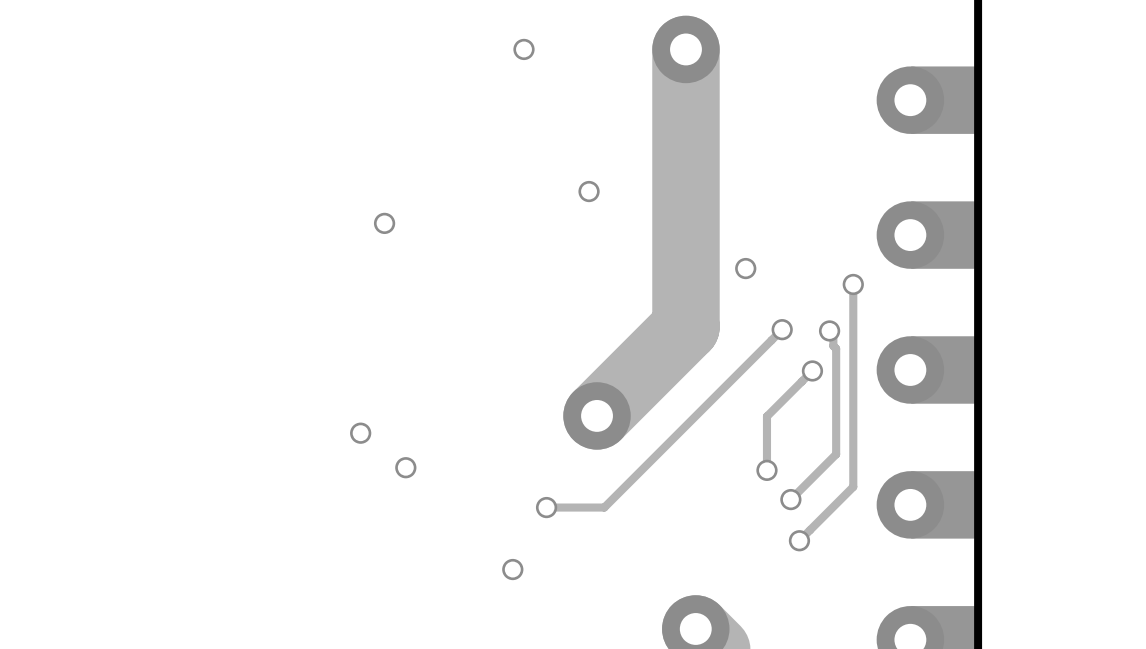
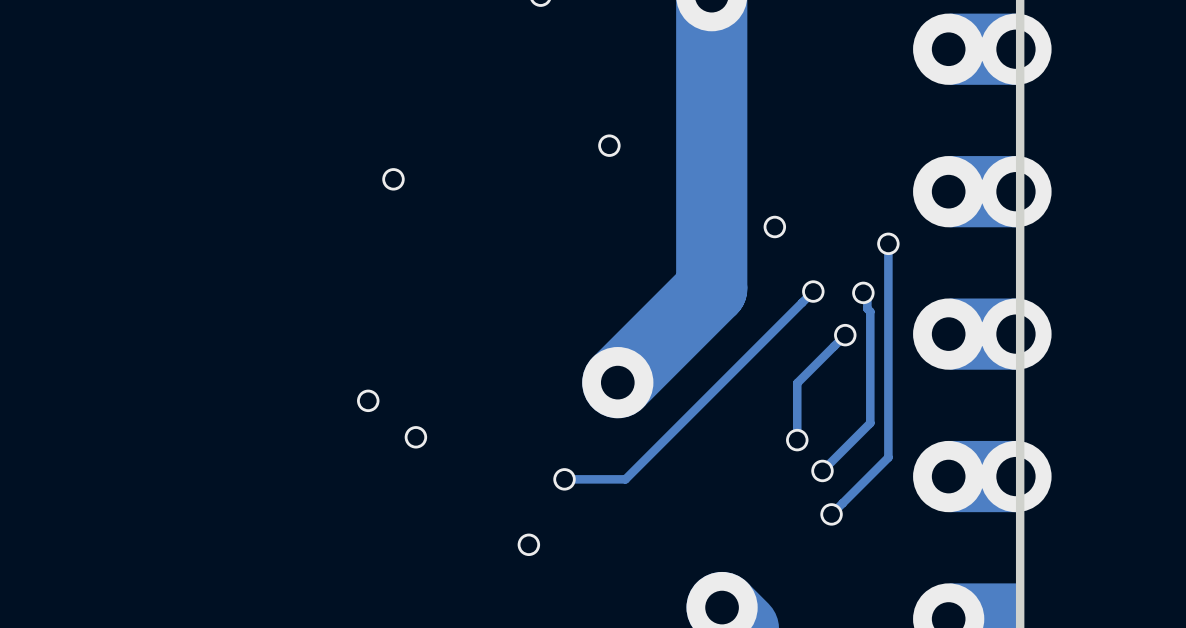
via: none -> (1015, 49)
via: none -> (1015, 191)
via: none -> (1015, 334)
via: none -> (1015, 476)

